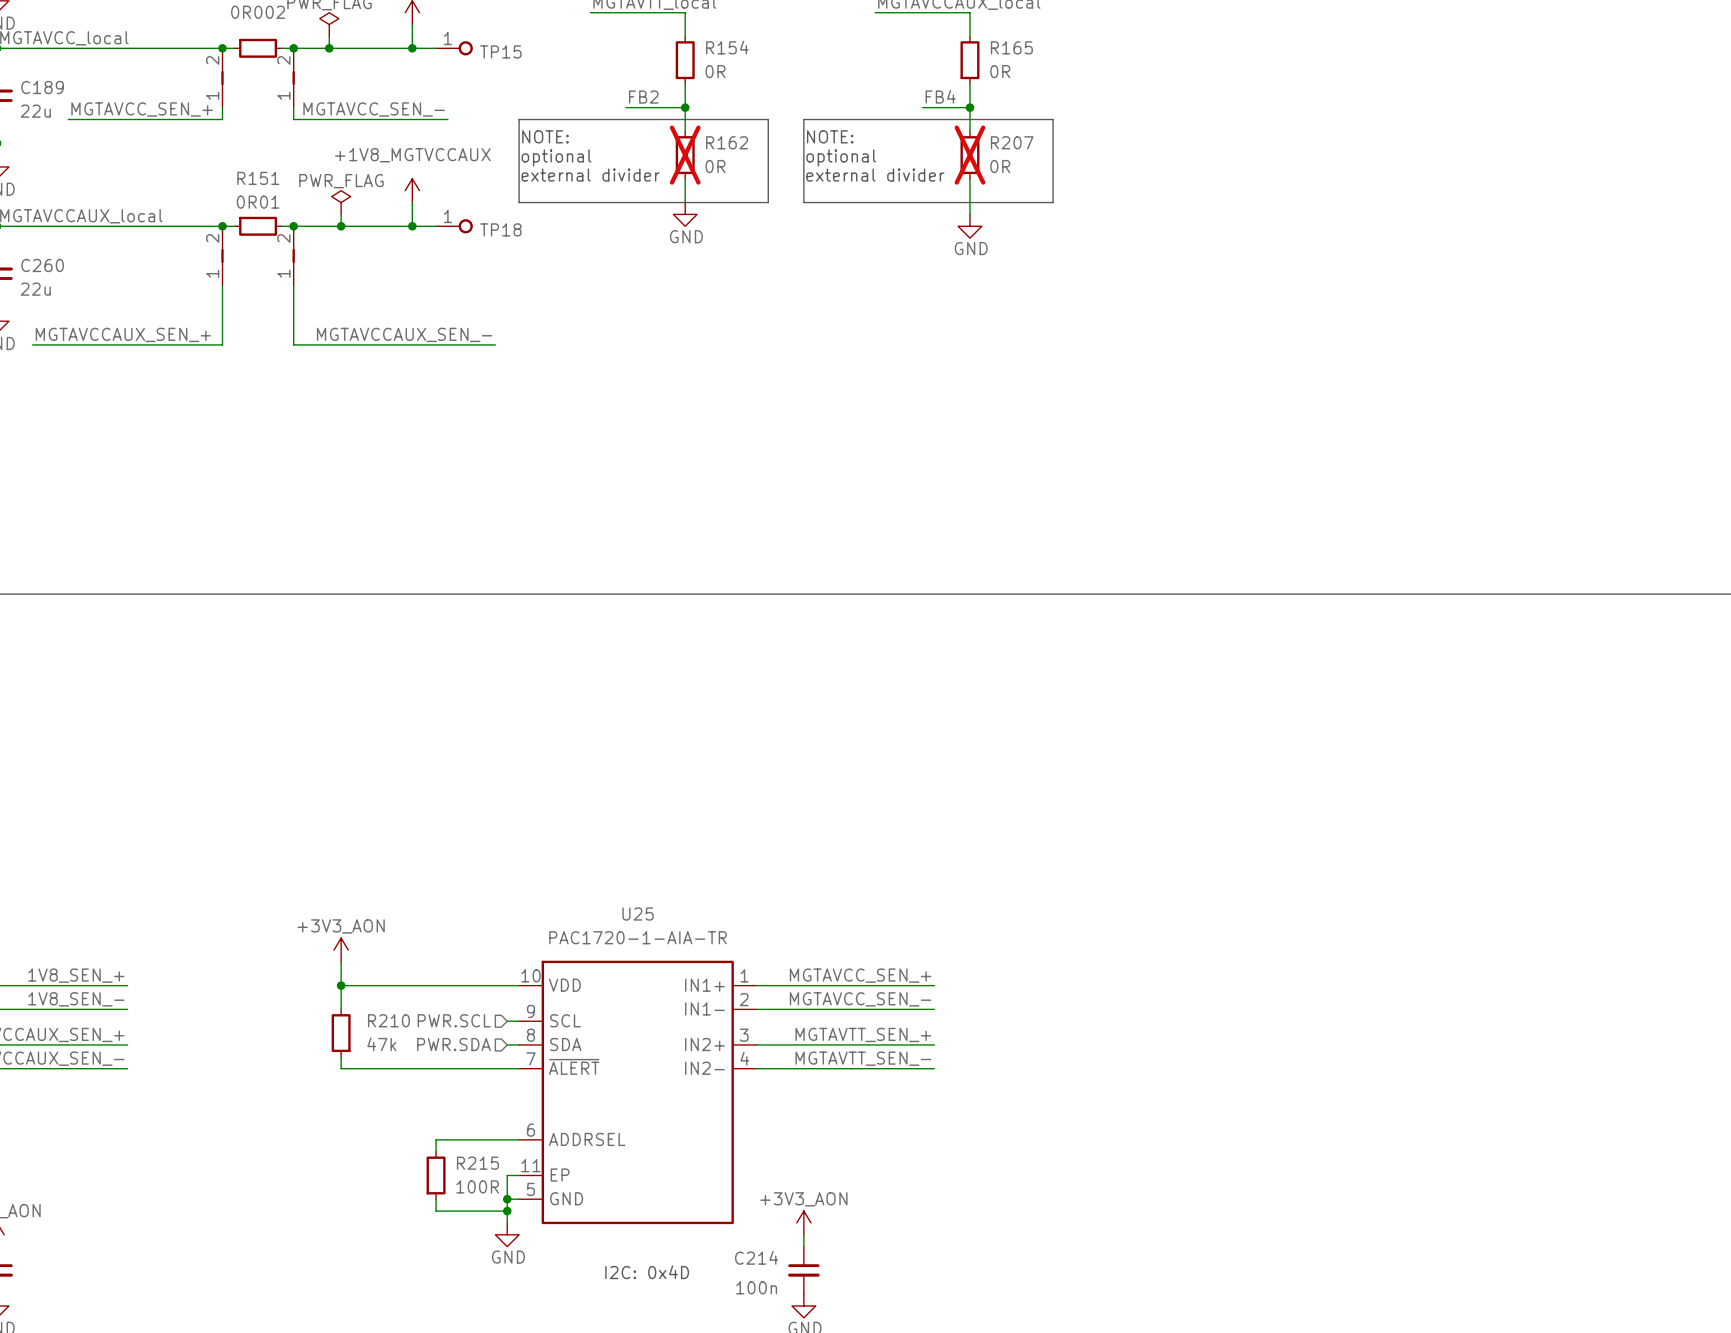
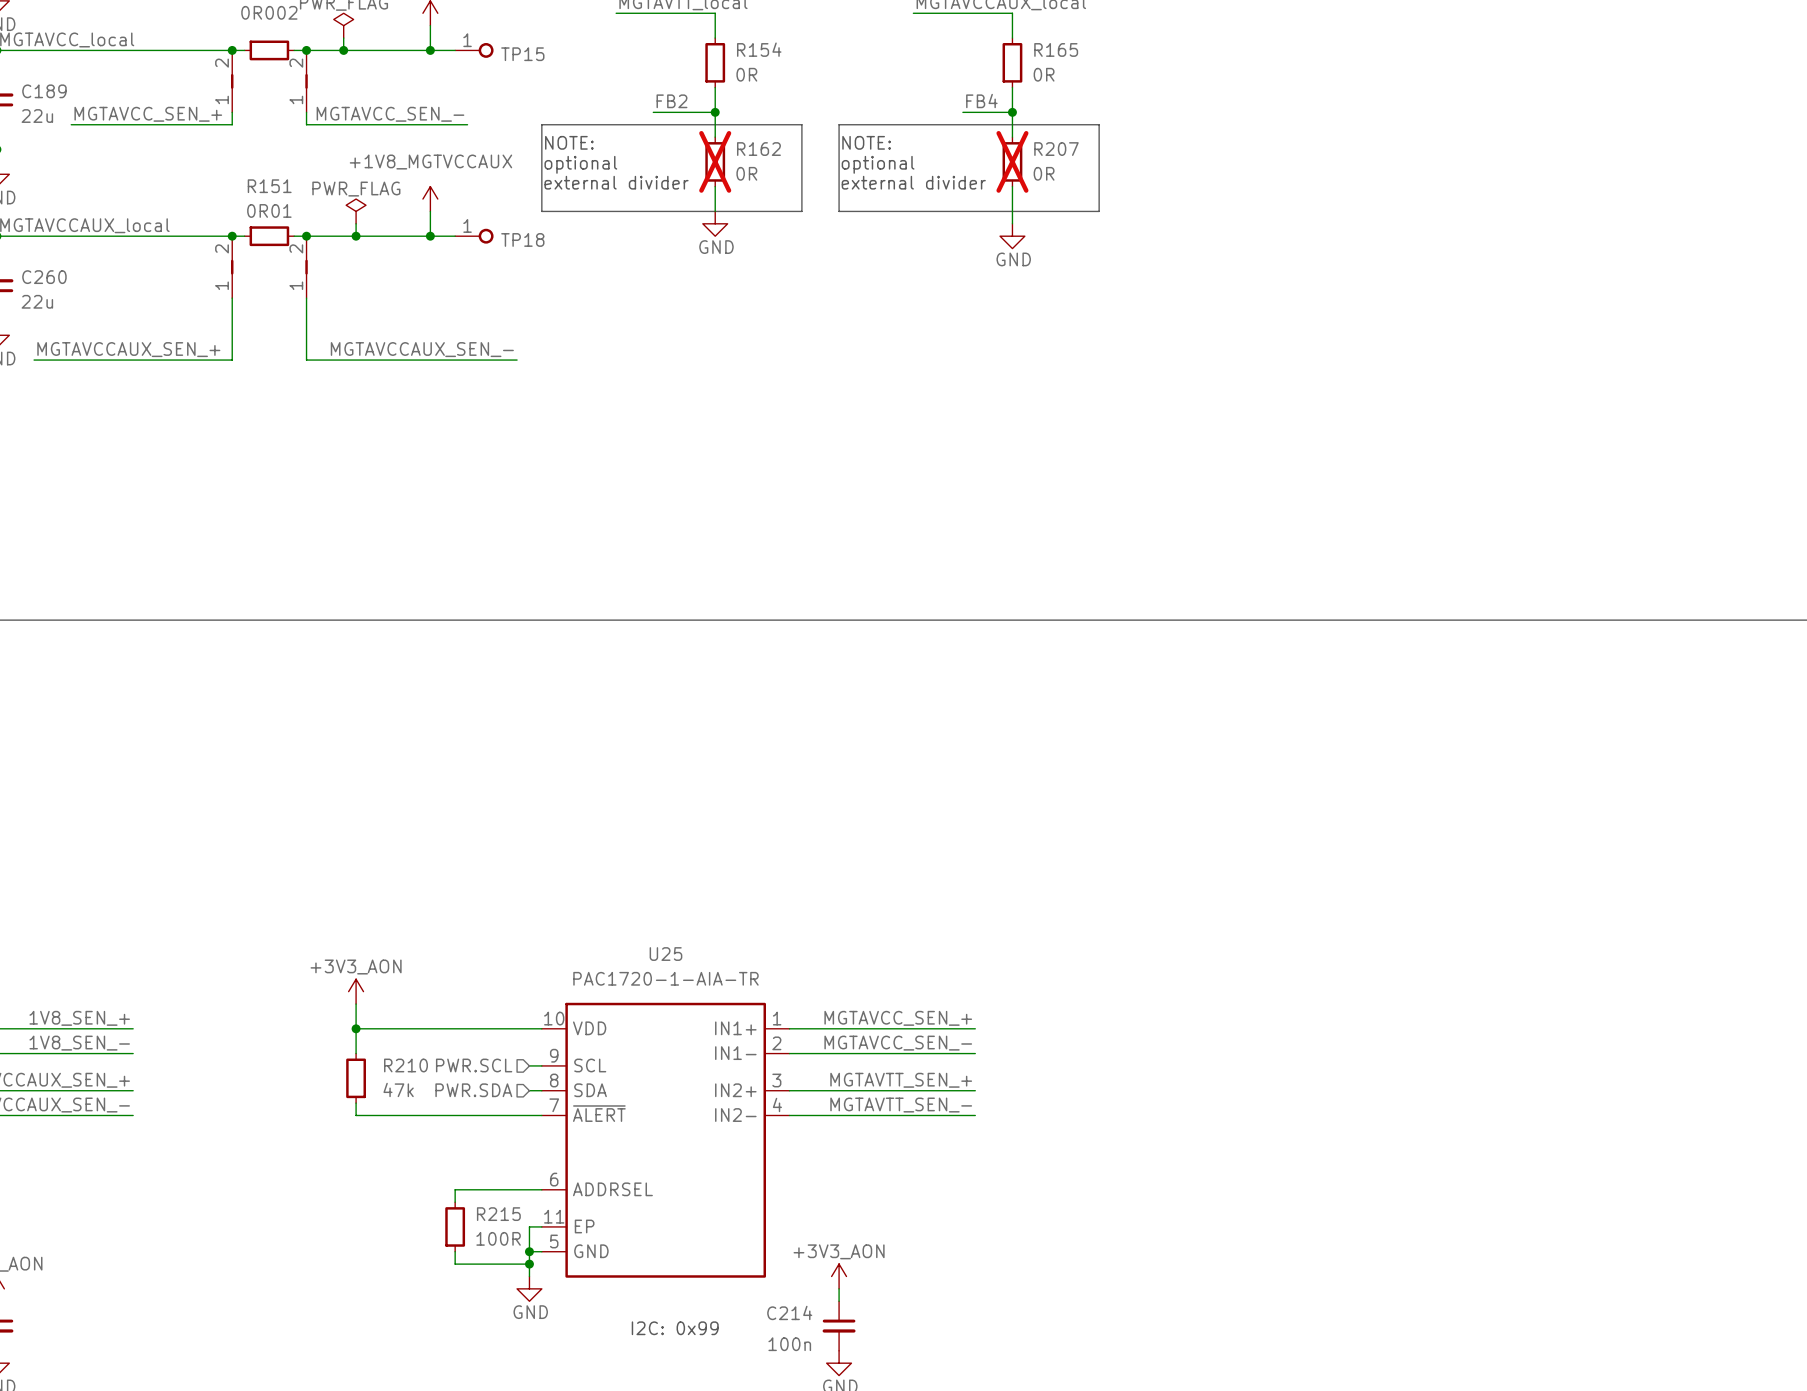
text: I2C: 0x4D (647, 1272) -> I2C: 0x99 (675, 1328)

